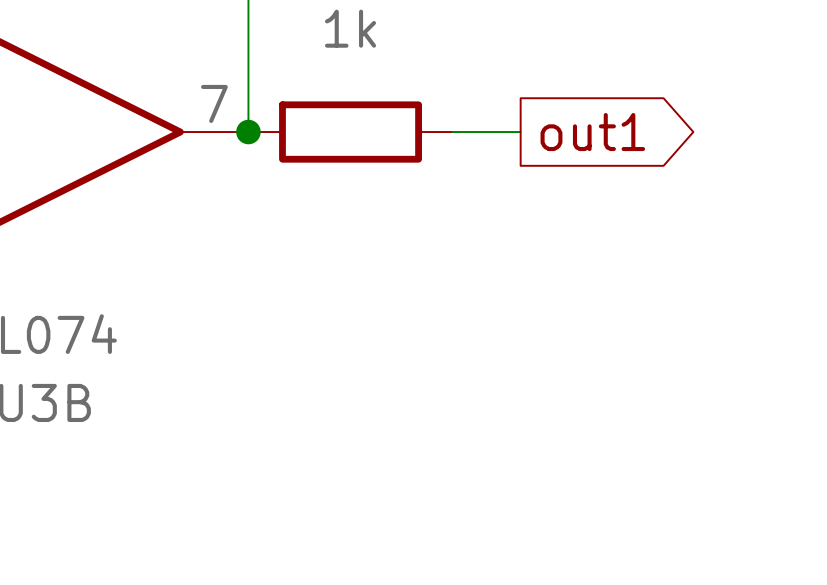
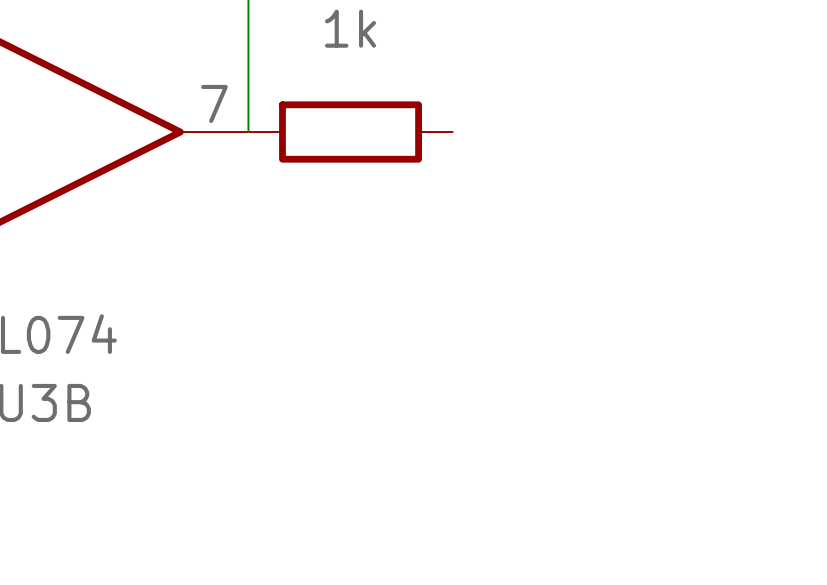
junction: (248, 132) -> none
wire: (452, 132) (520, 132) -> none
global label: out1 (592, 132) -> none

